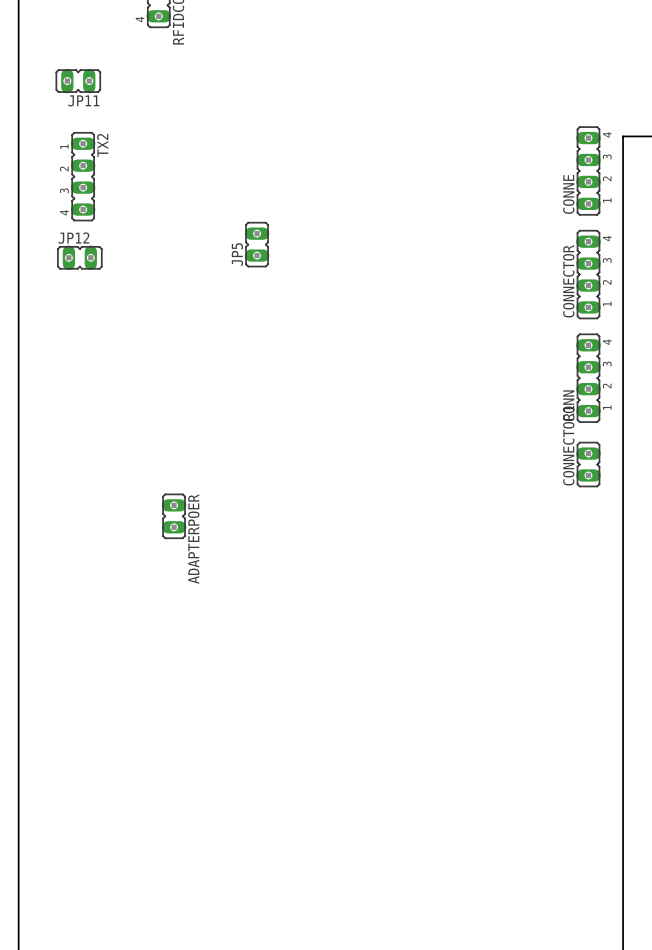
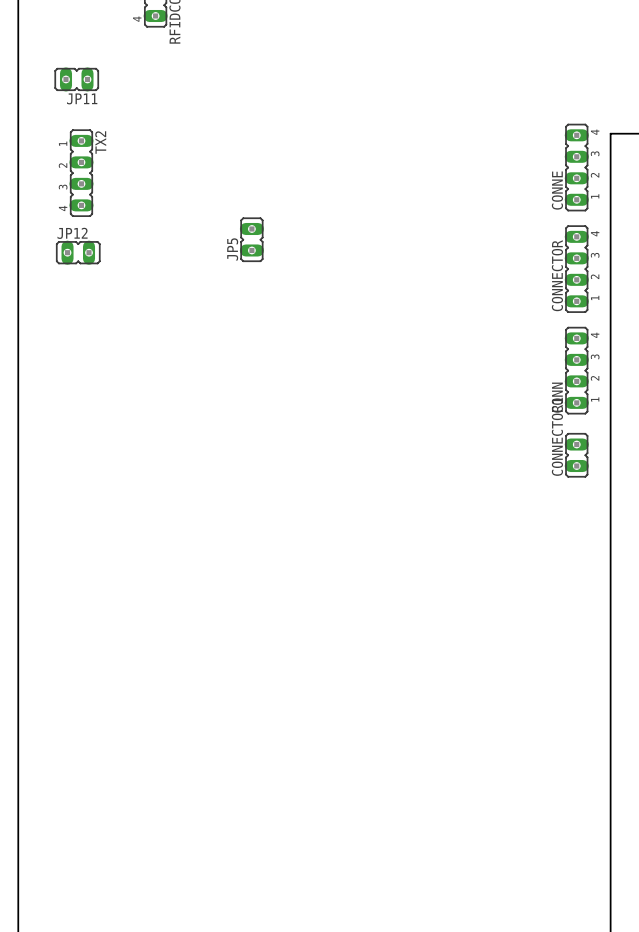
ADAPTERPOER: (174, 516) -> none

